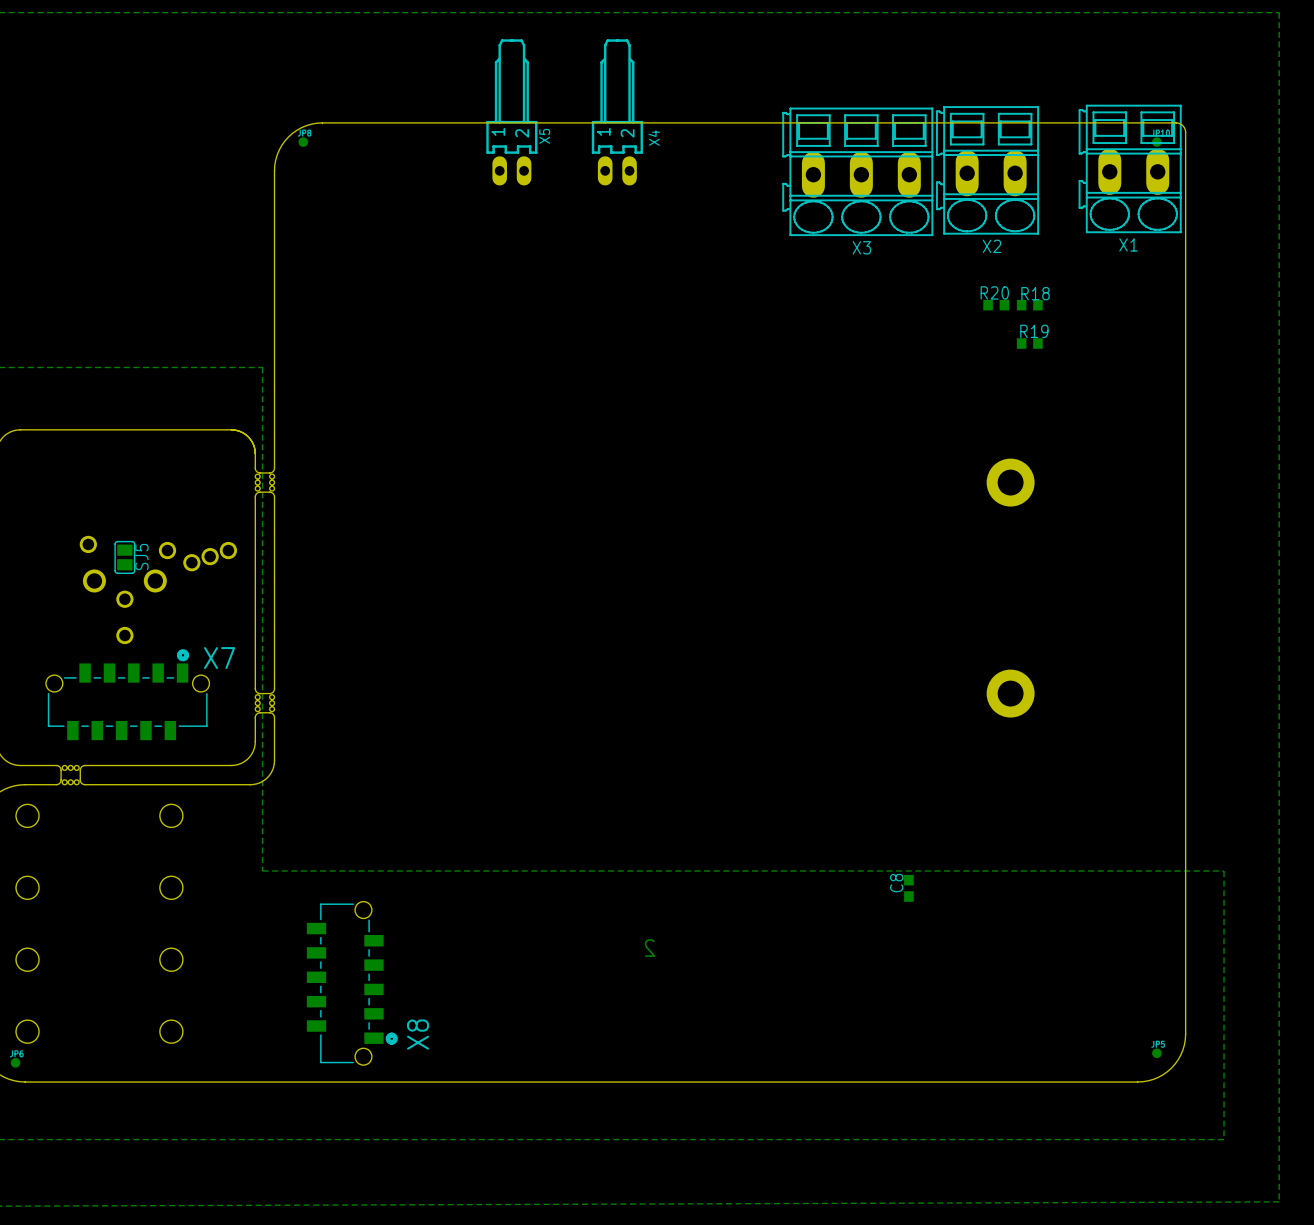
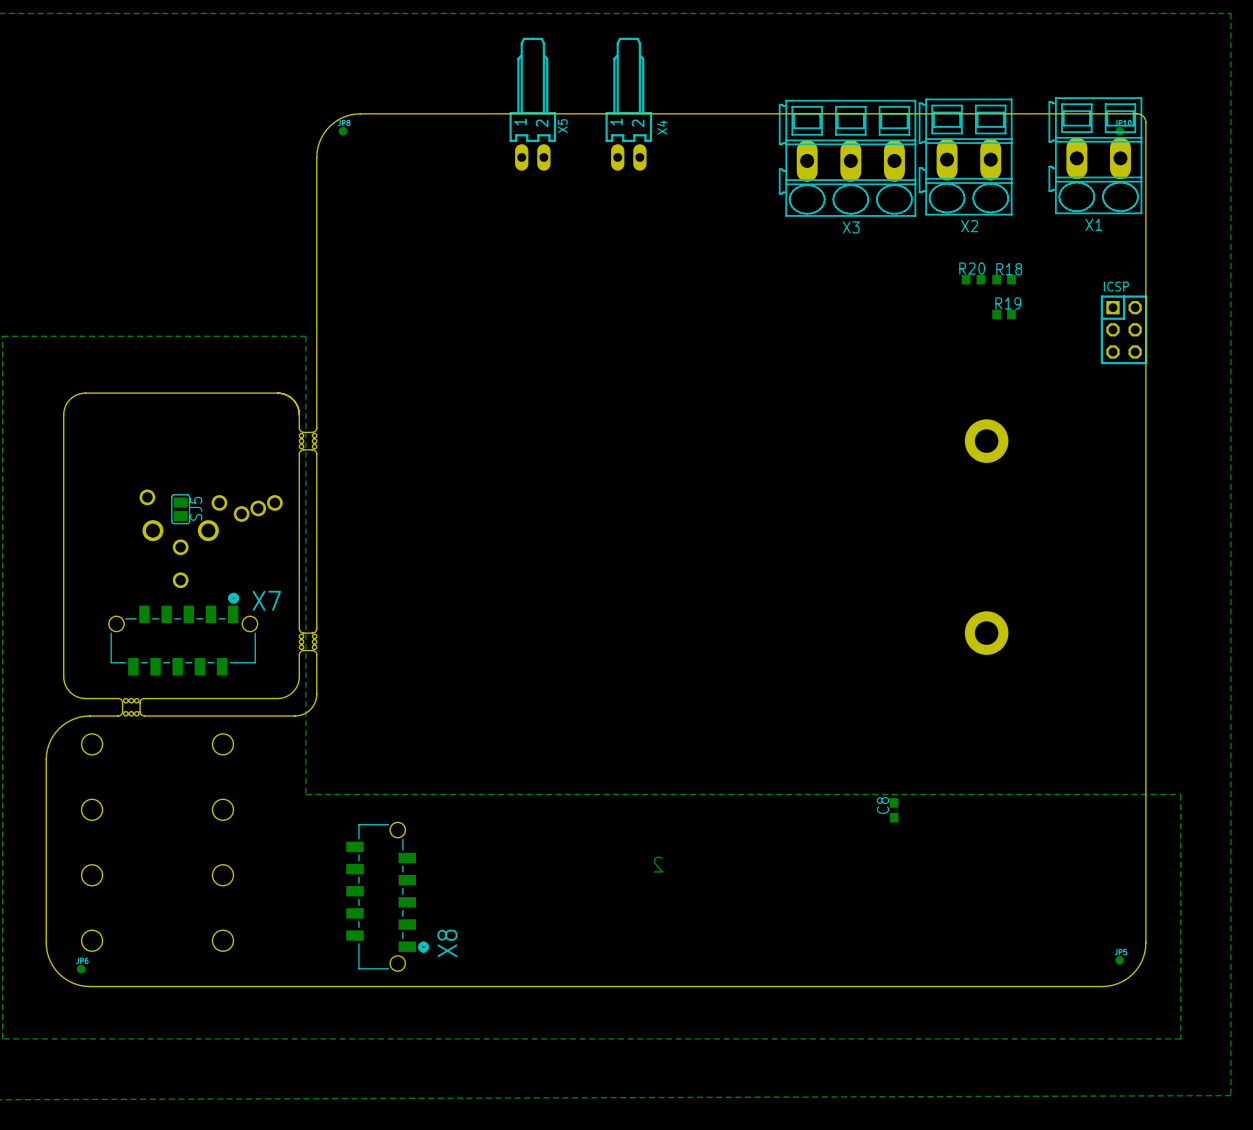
ICSP: none -> (1124, 329)

